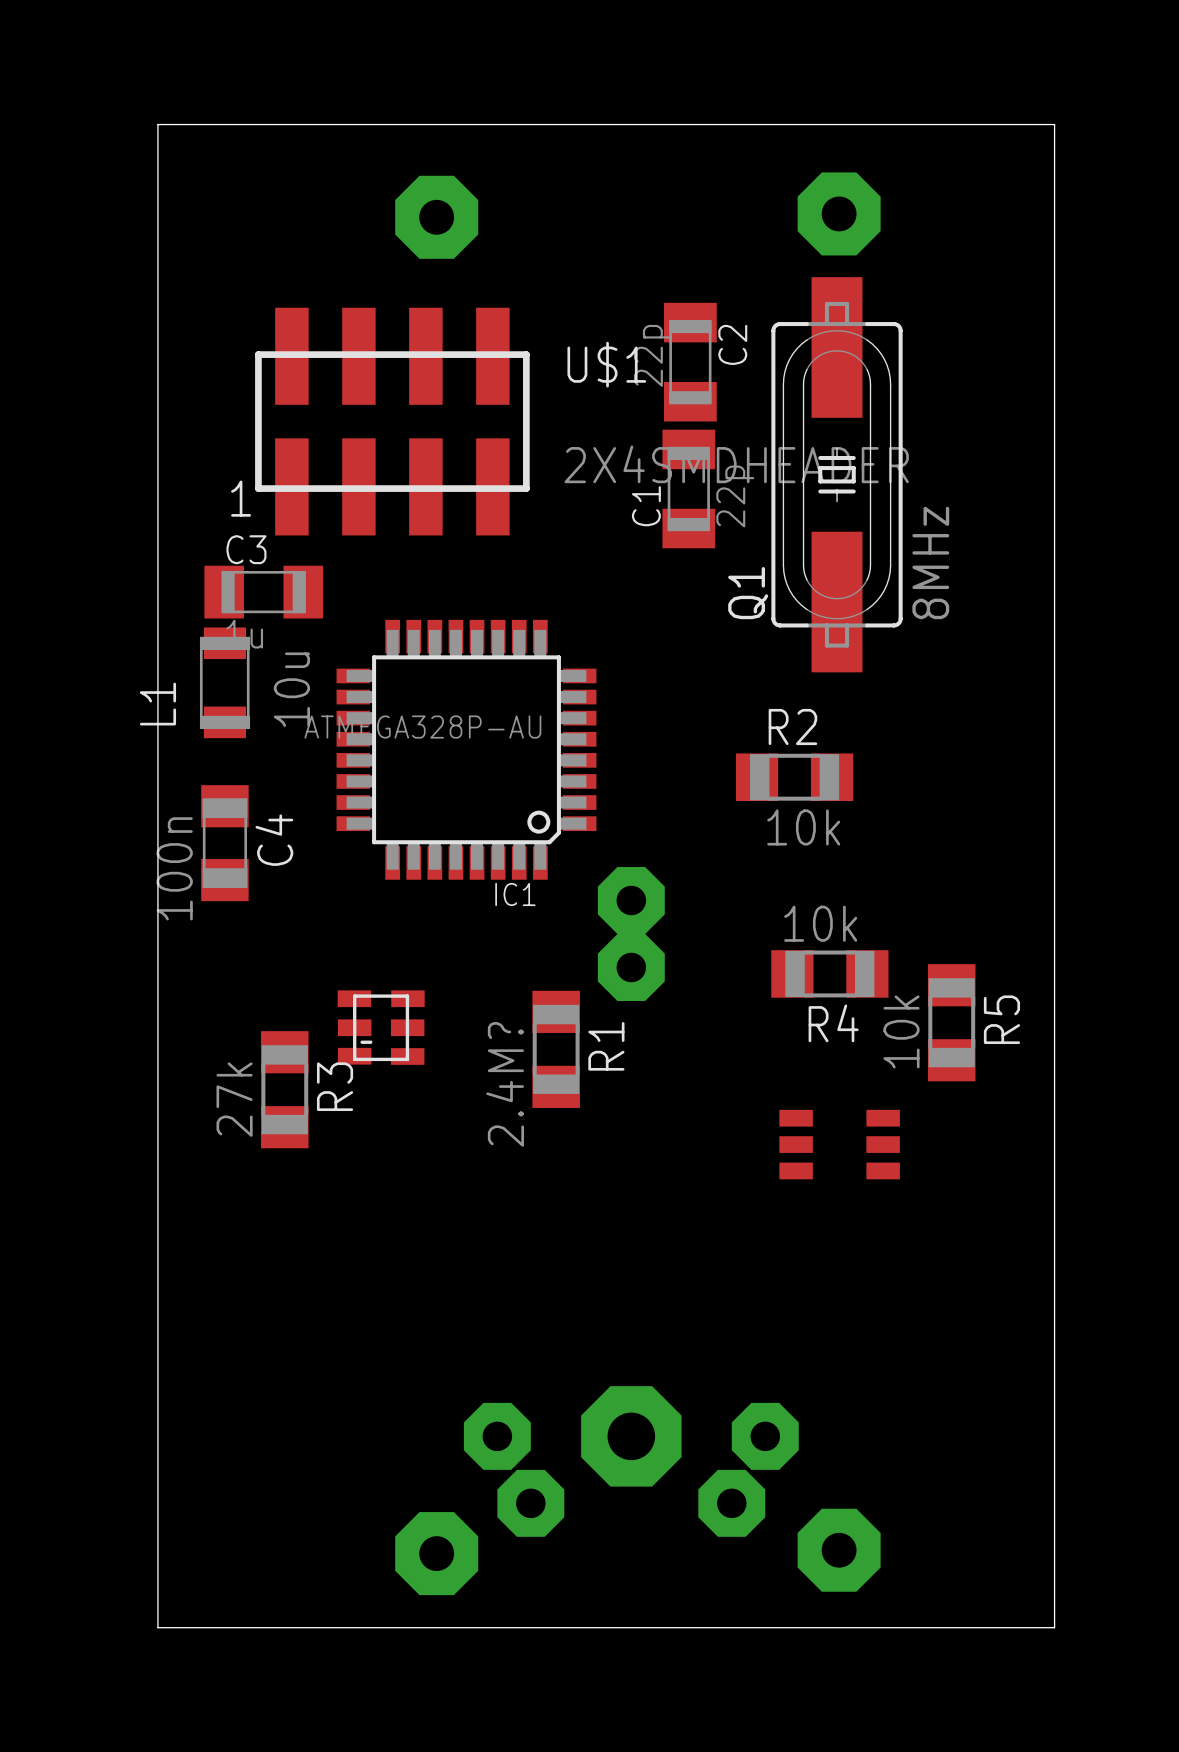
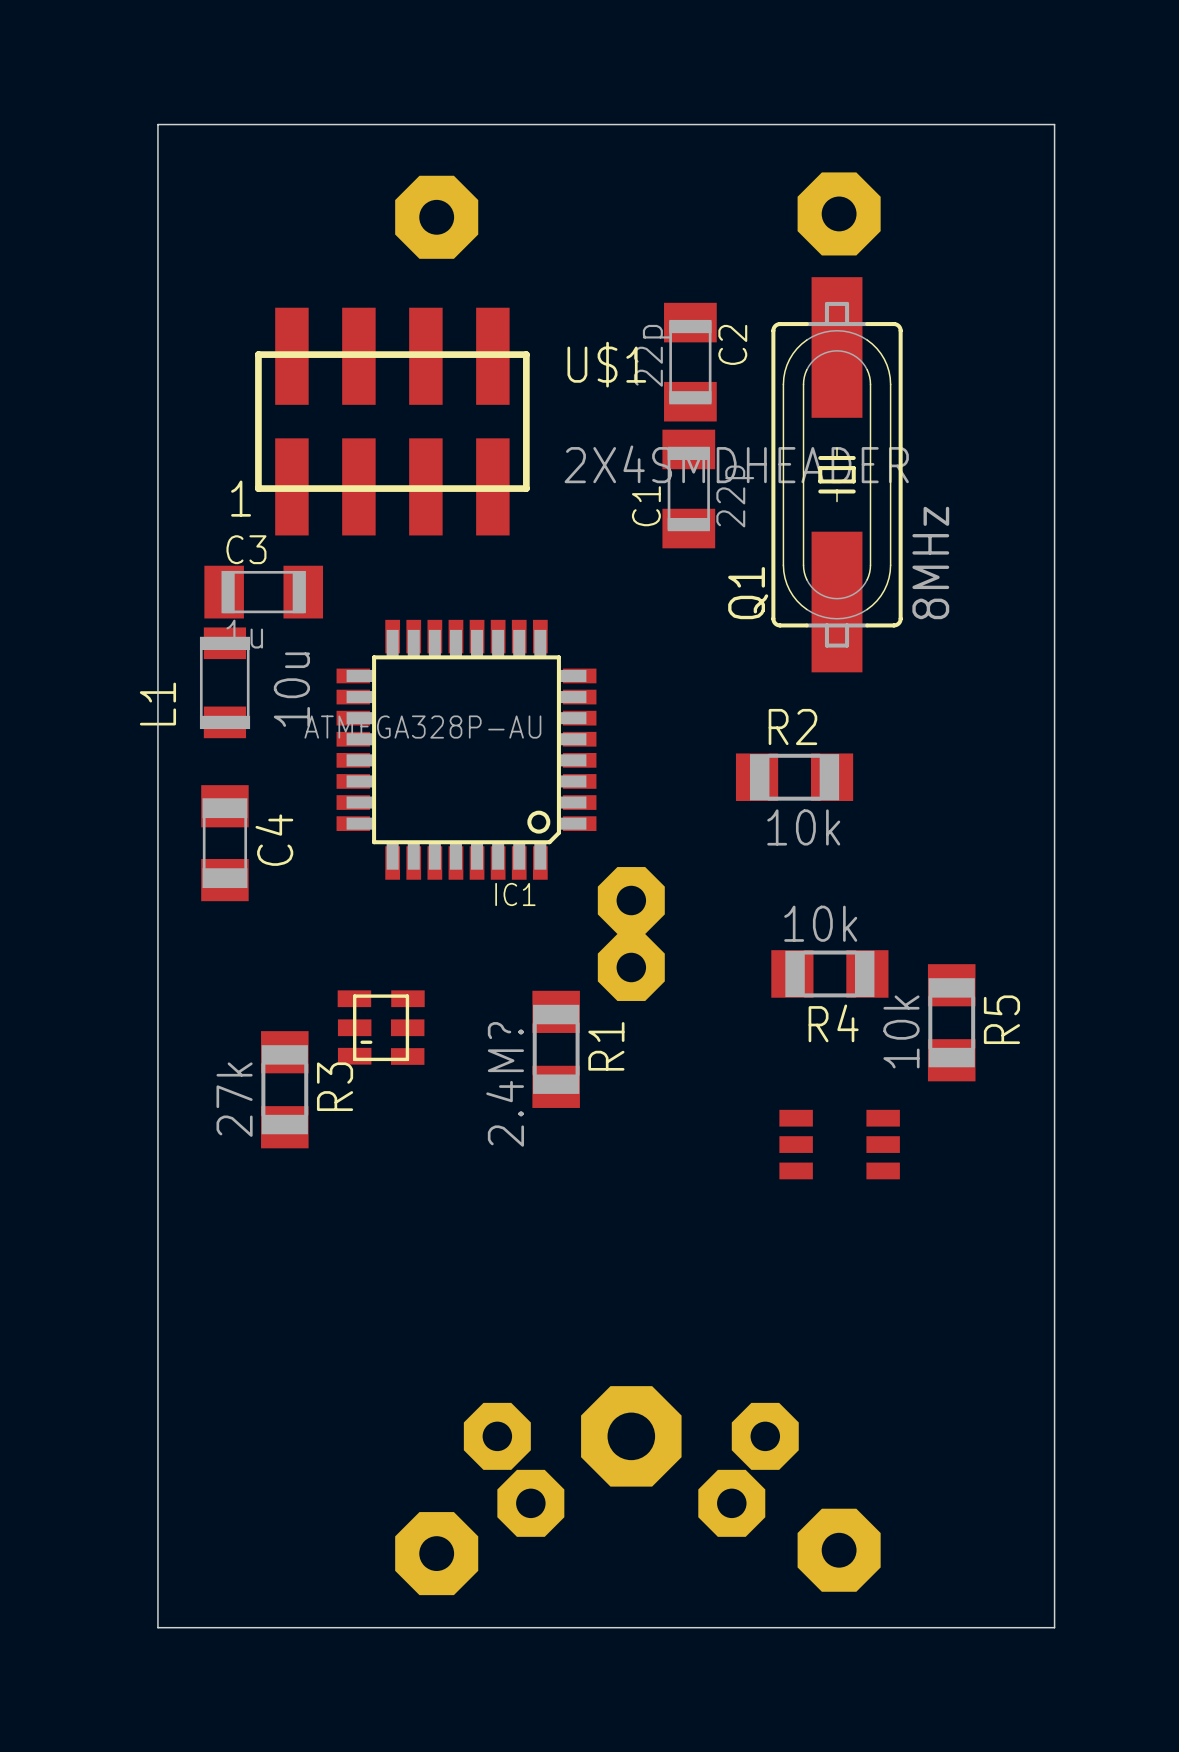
C4 value: 100n (174, 868) -> none

